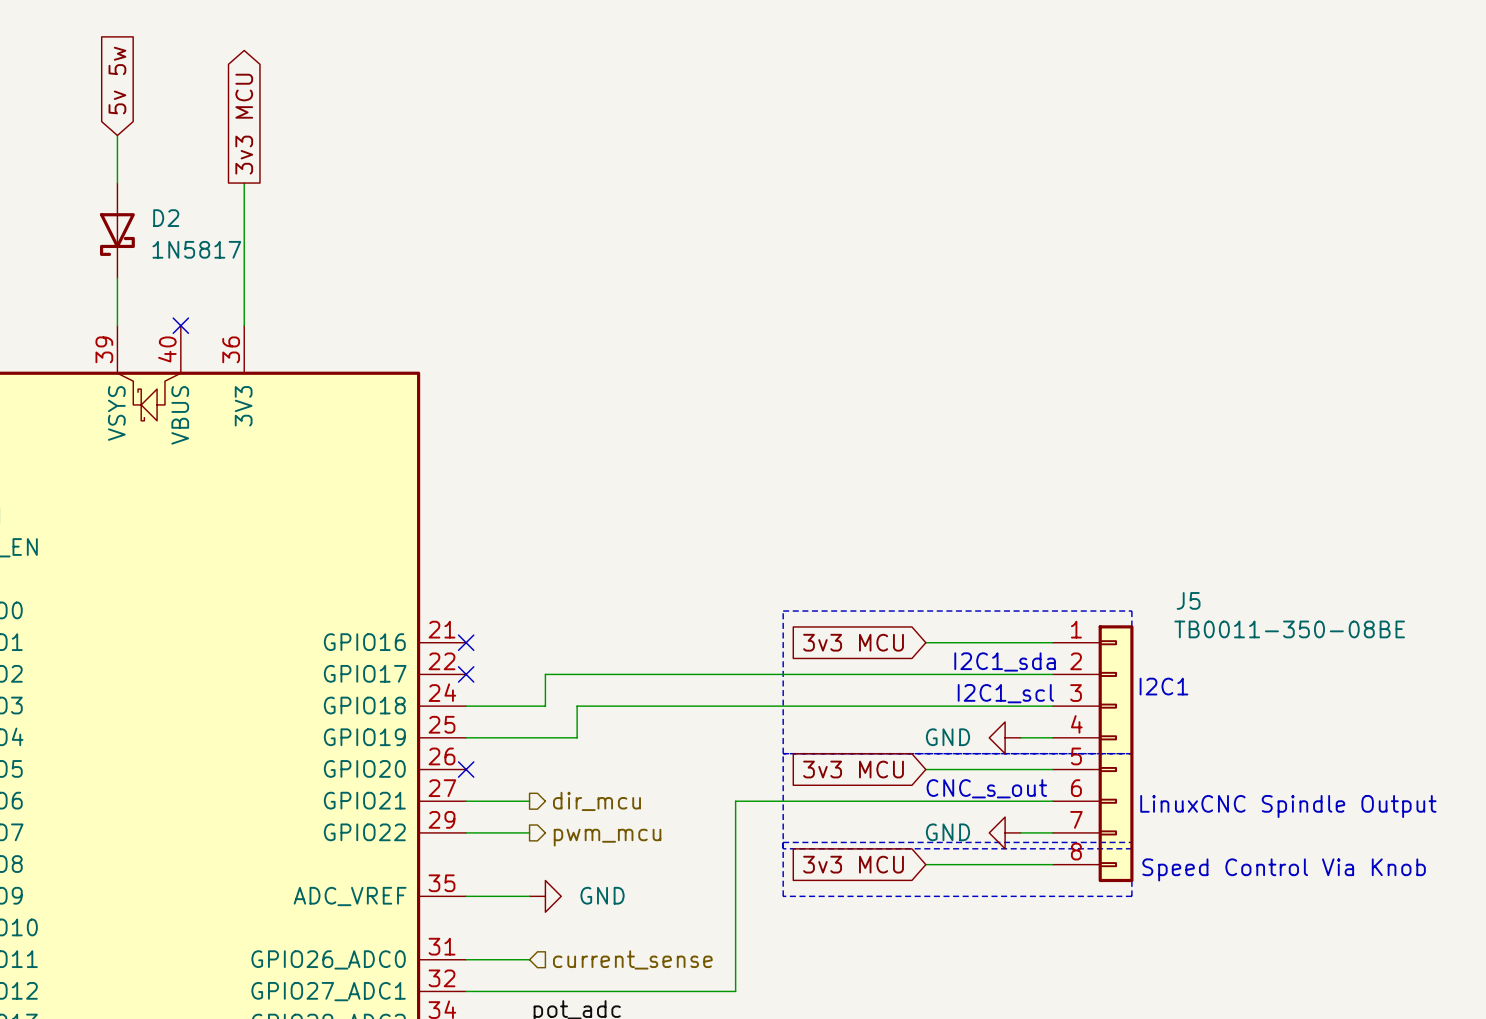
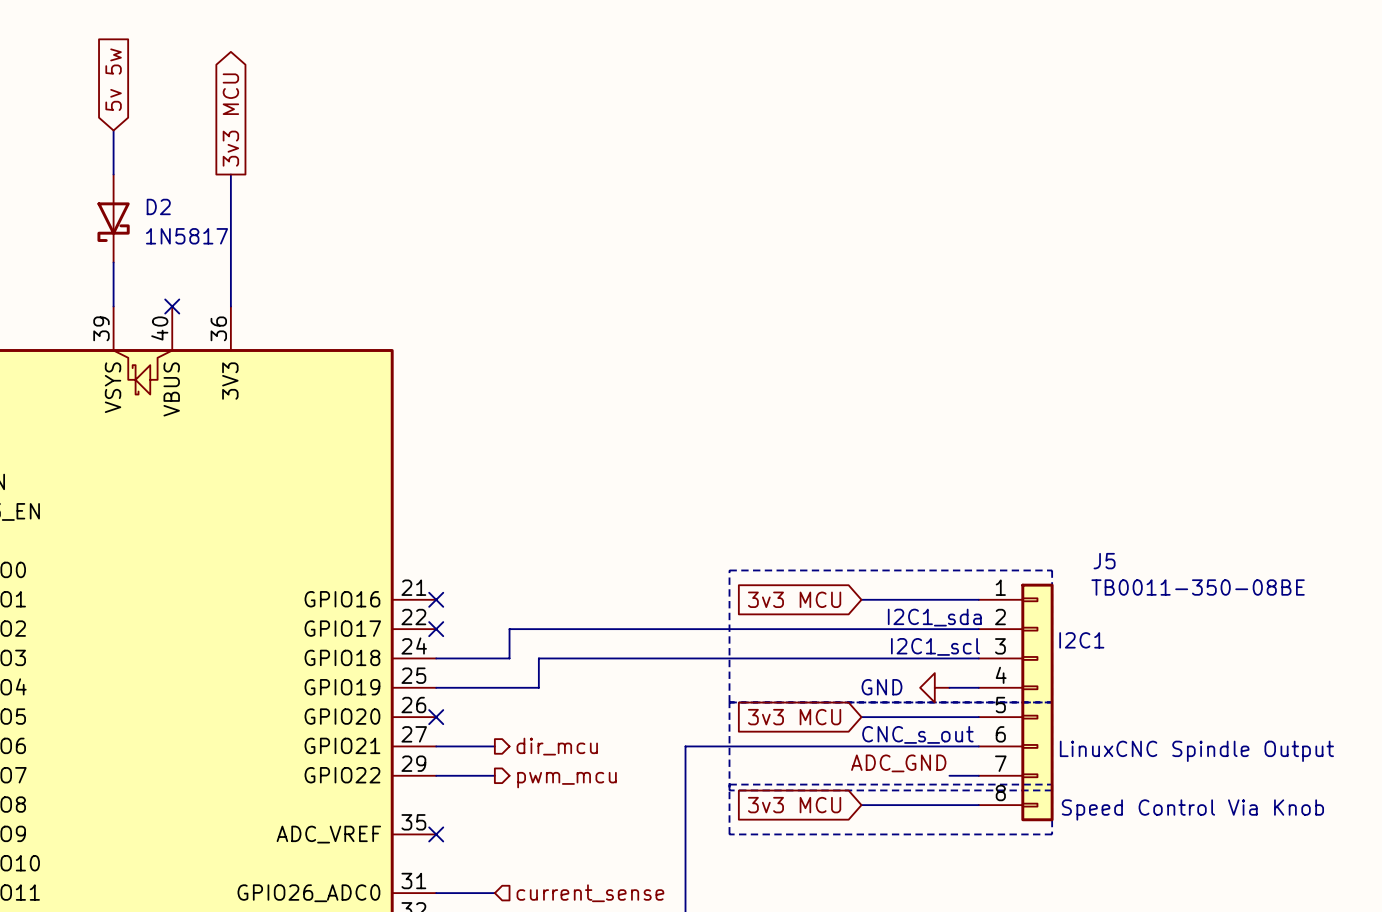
label: none -> ADC_GND (898, 763)
power symbol: GND (1005, 832) -> none
wire: (466, 896) (529, 896) -> none
no-connect mark: none -> (436, 834)
power symbol: GND (545, 896) -> none

